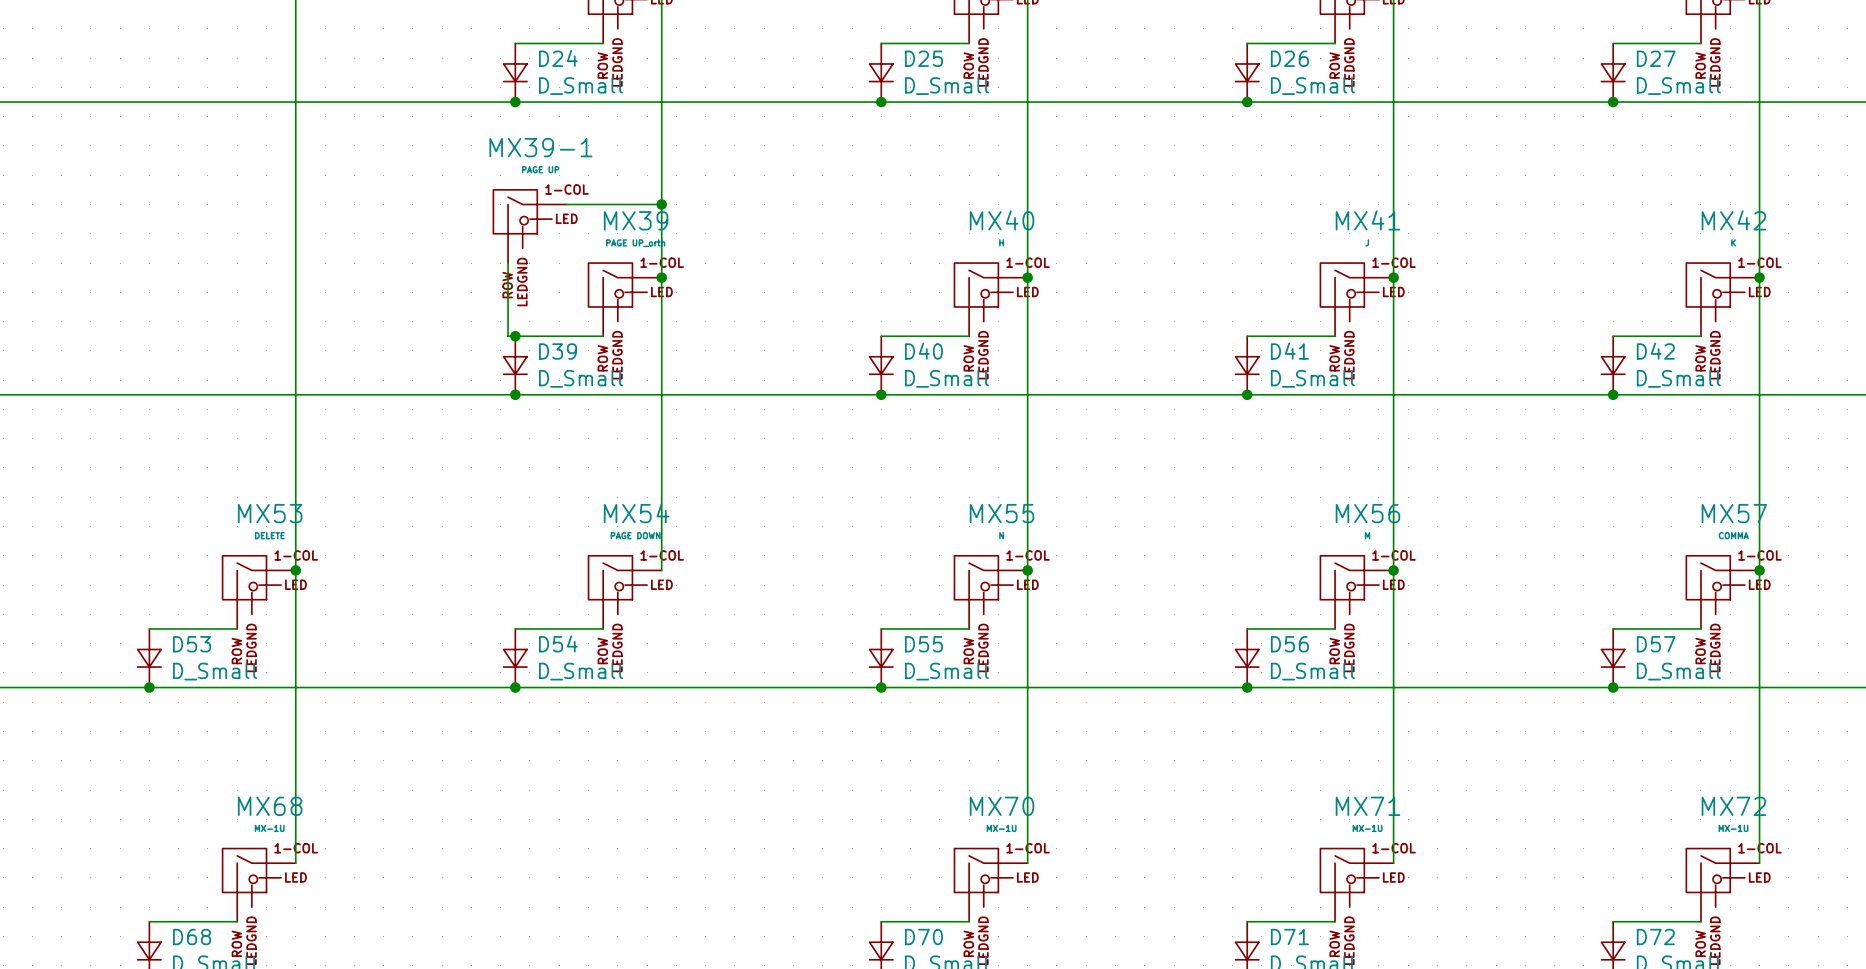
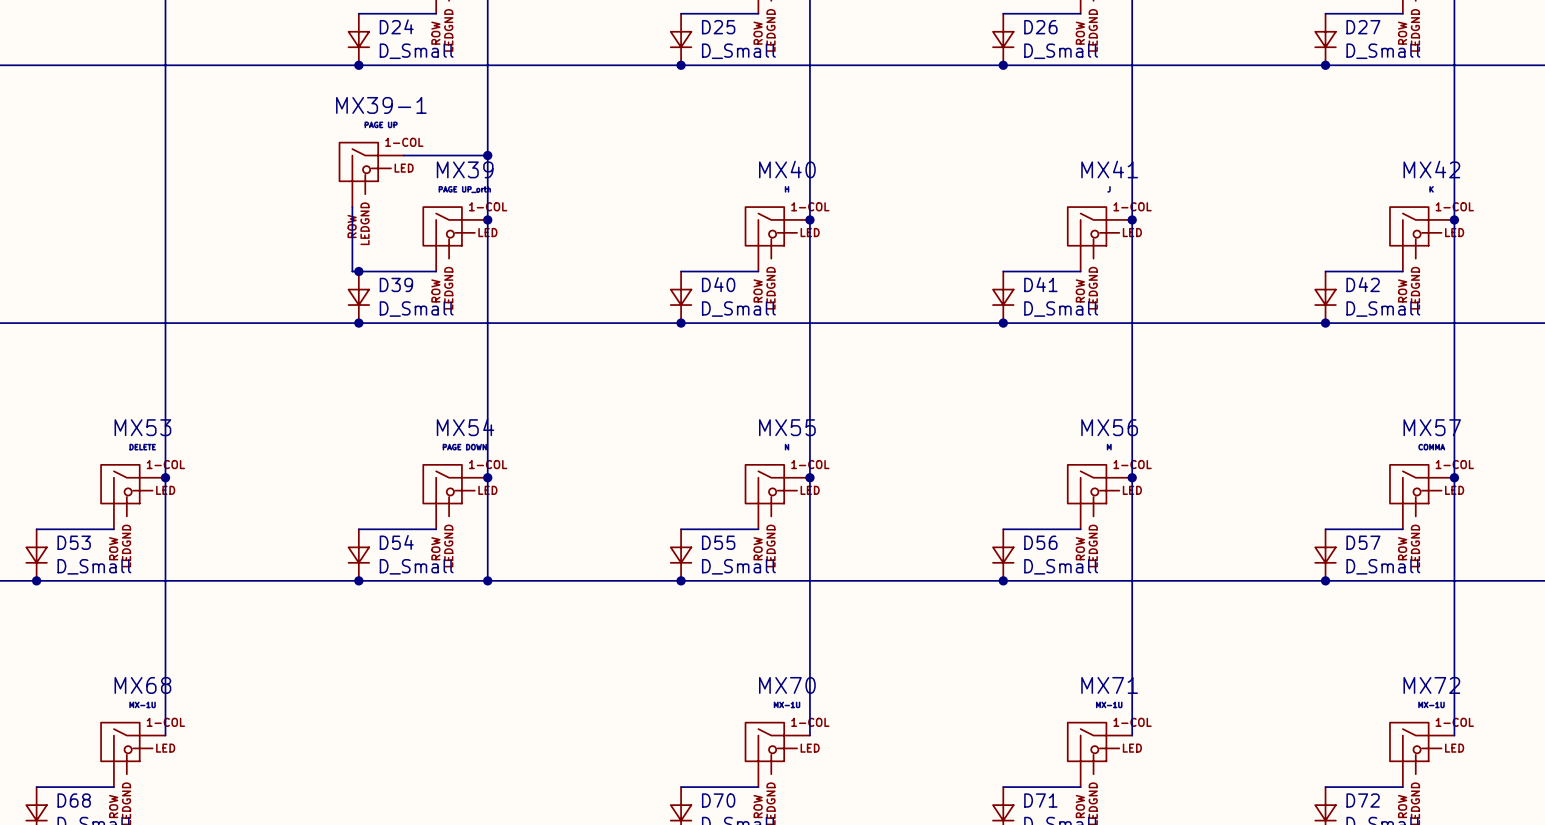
wire: none -> (487, 477) (487, 580)
junction: none -> (487, 477)
junction: none -> (487, 580)

